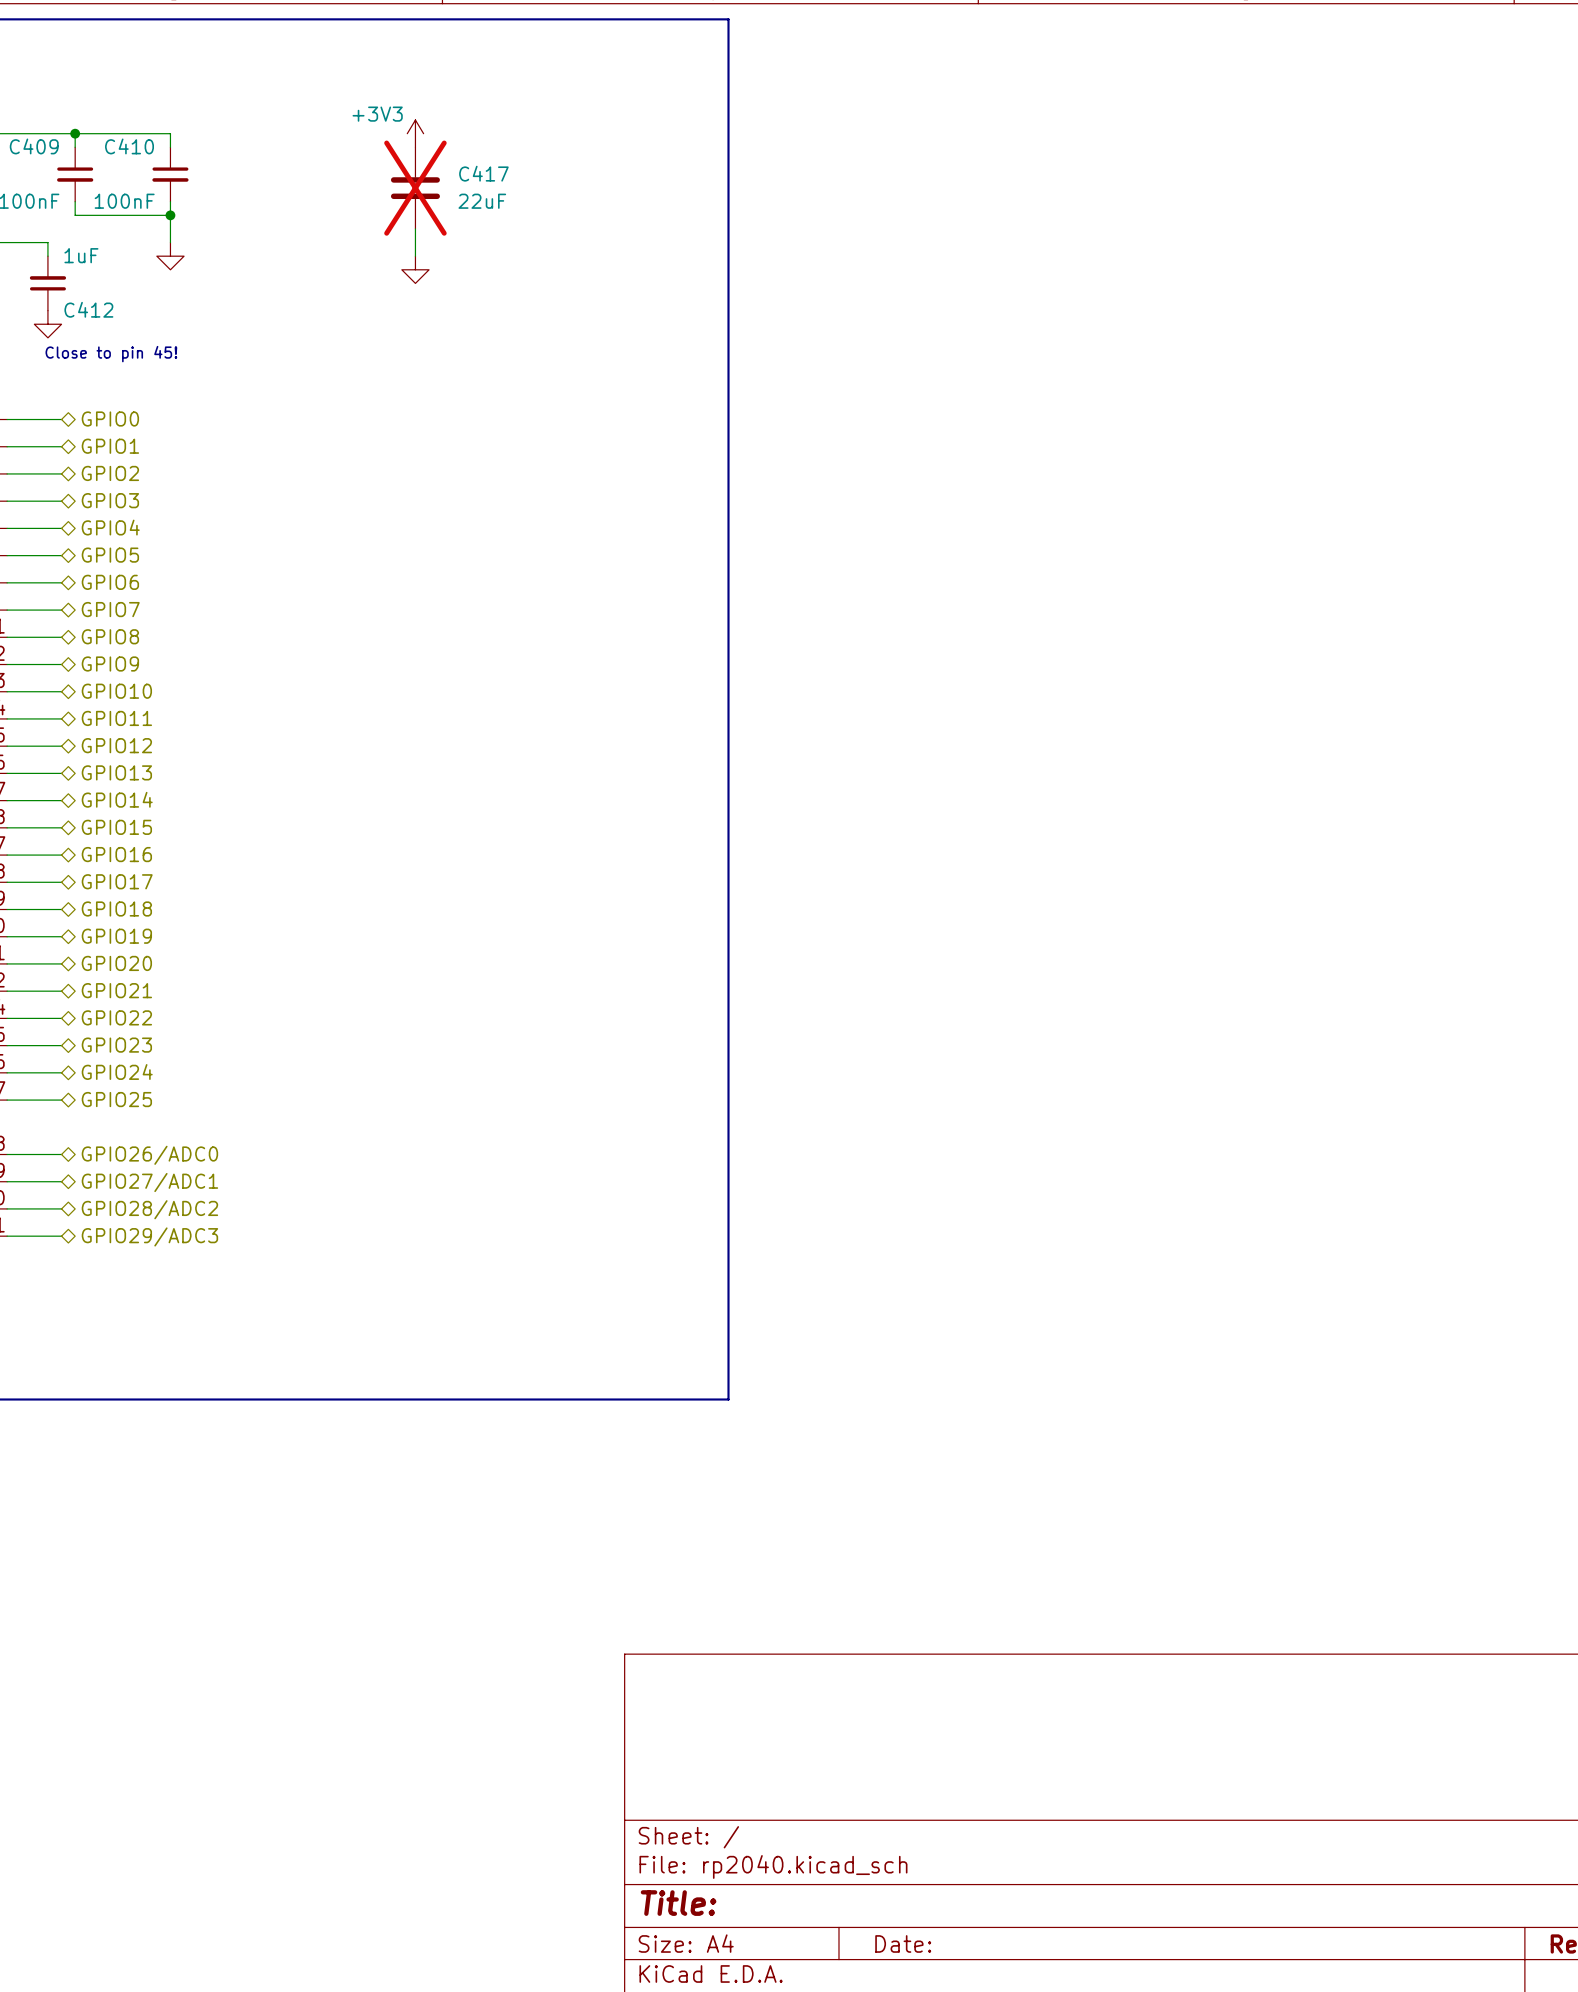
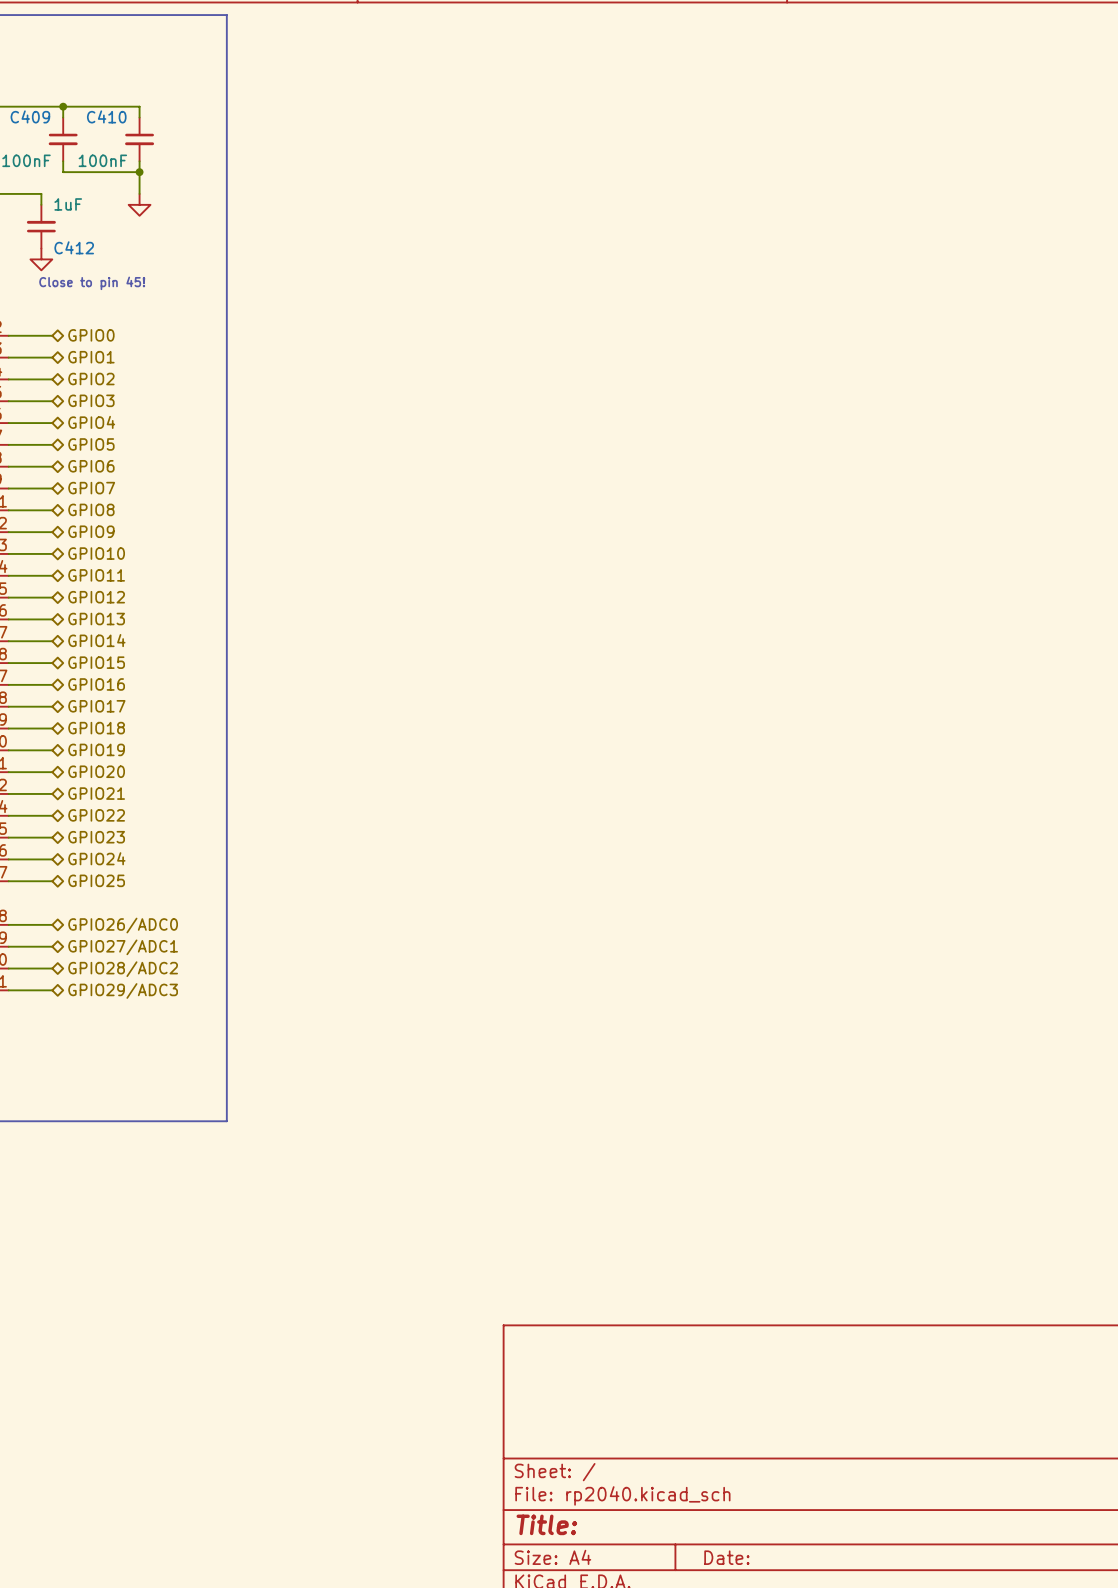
line: (279, 19) (728, 19) (728, 1399) (279, 1399) -> (226, 15) (226, 1121)
power symbol: +3V3 (415, 133) -> none
C417: 22uF (415, 188) -> none
wire: (415, 228) (415, 256) -> none
power symbol: (415, 269) -> none

